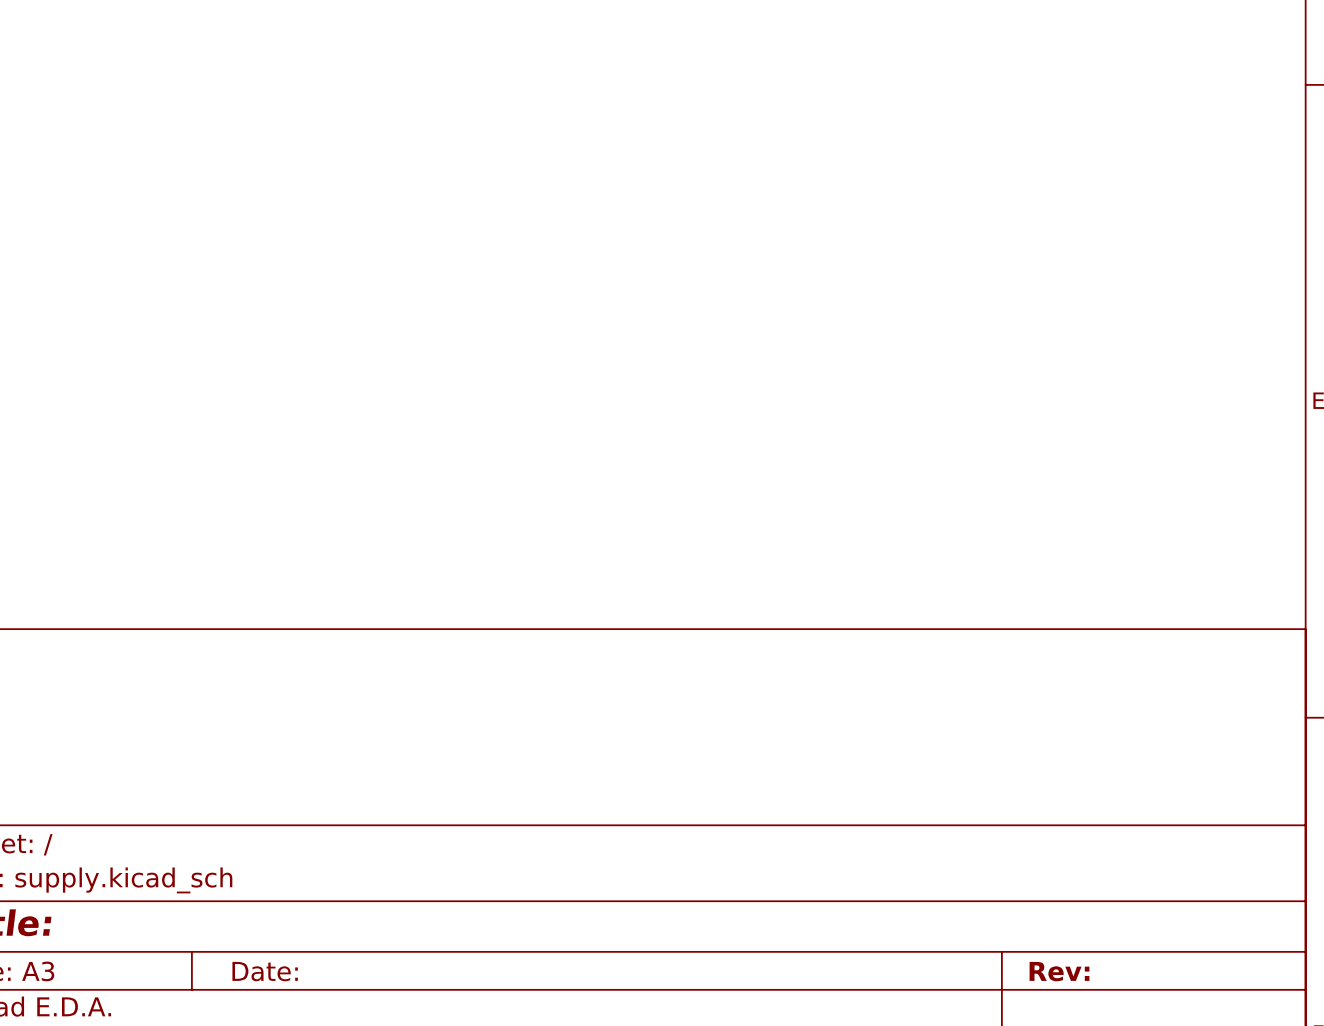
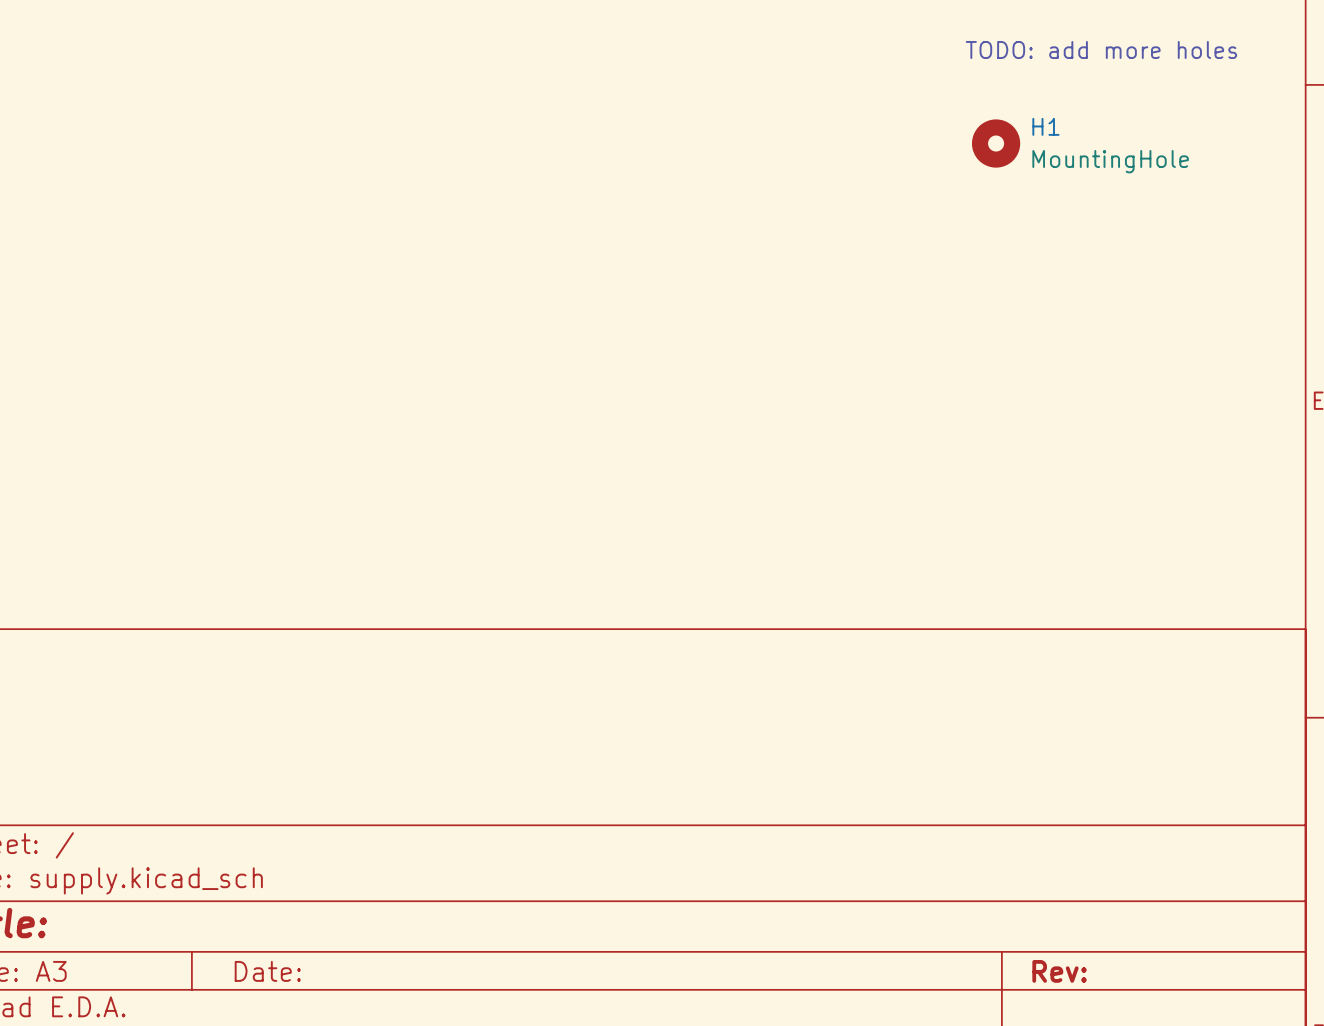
text: none -> TODO: add more holes (1101, 49)
H1: none -> MountingHole (996, 143)

